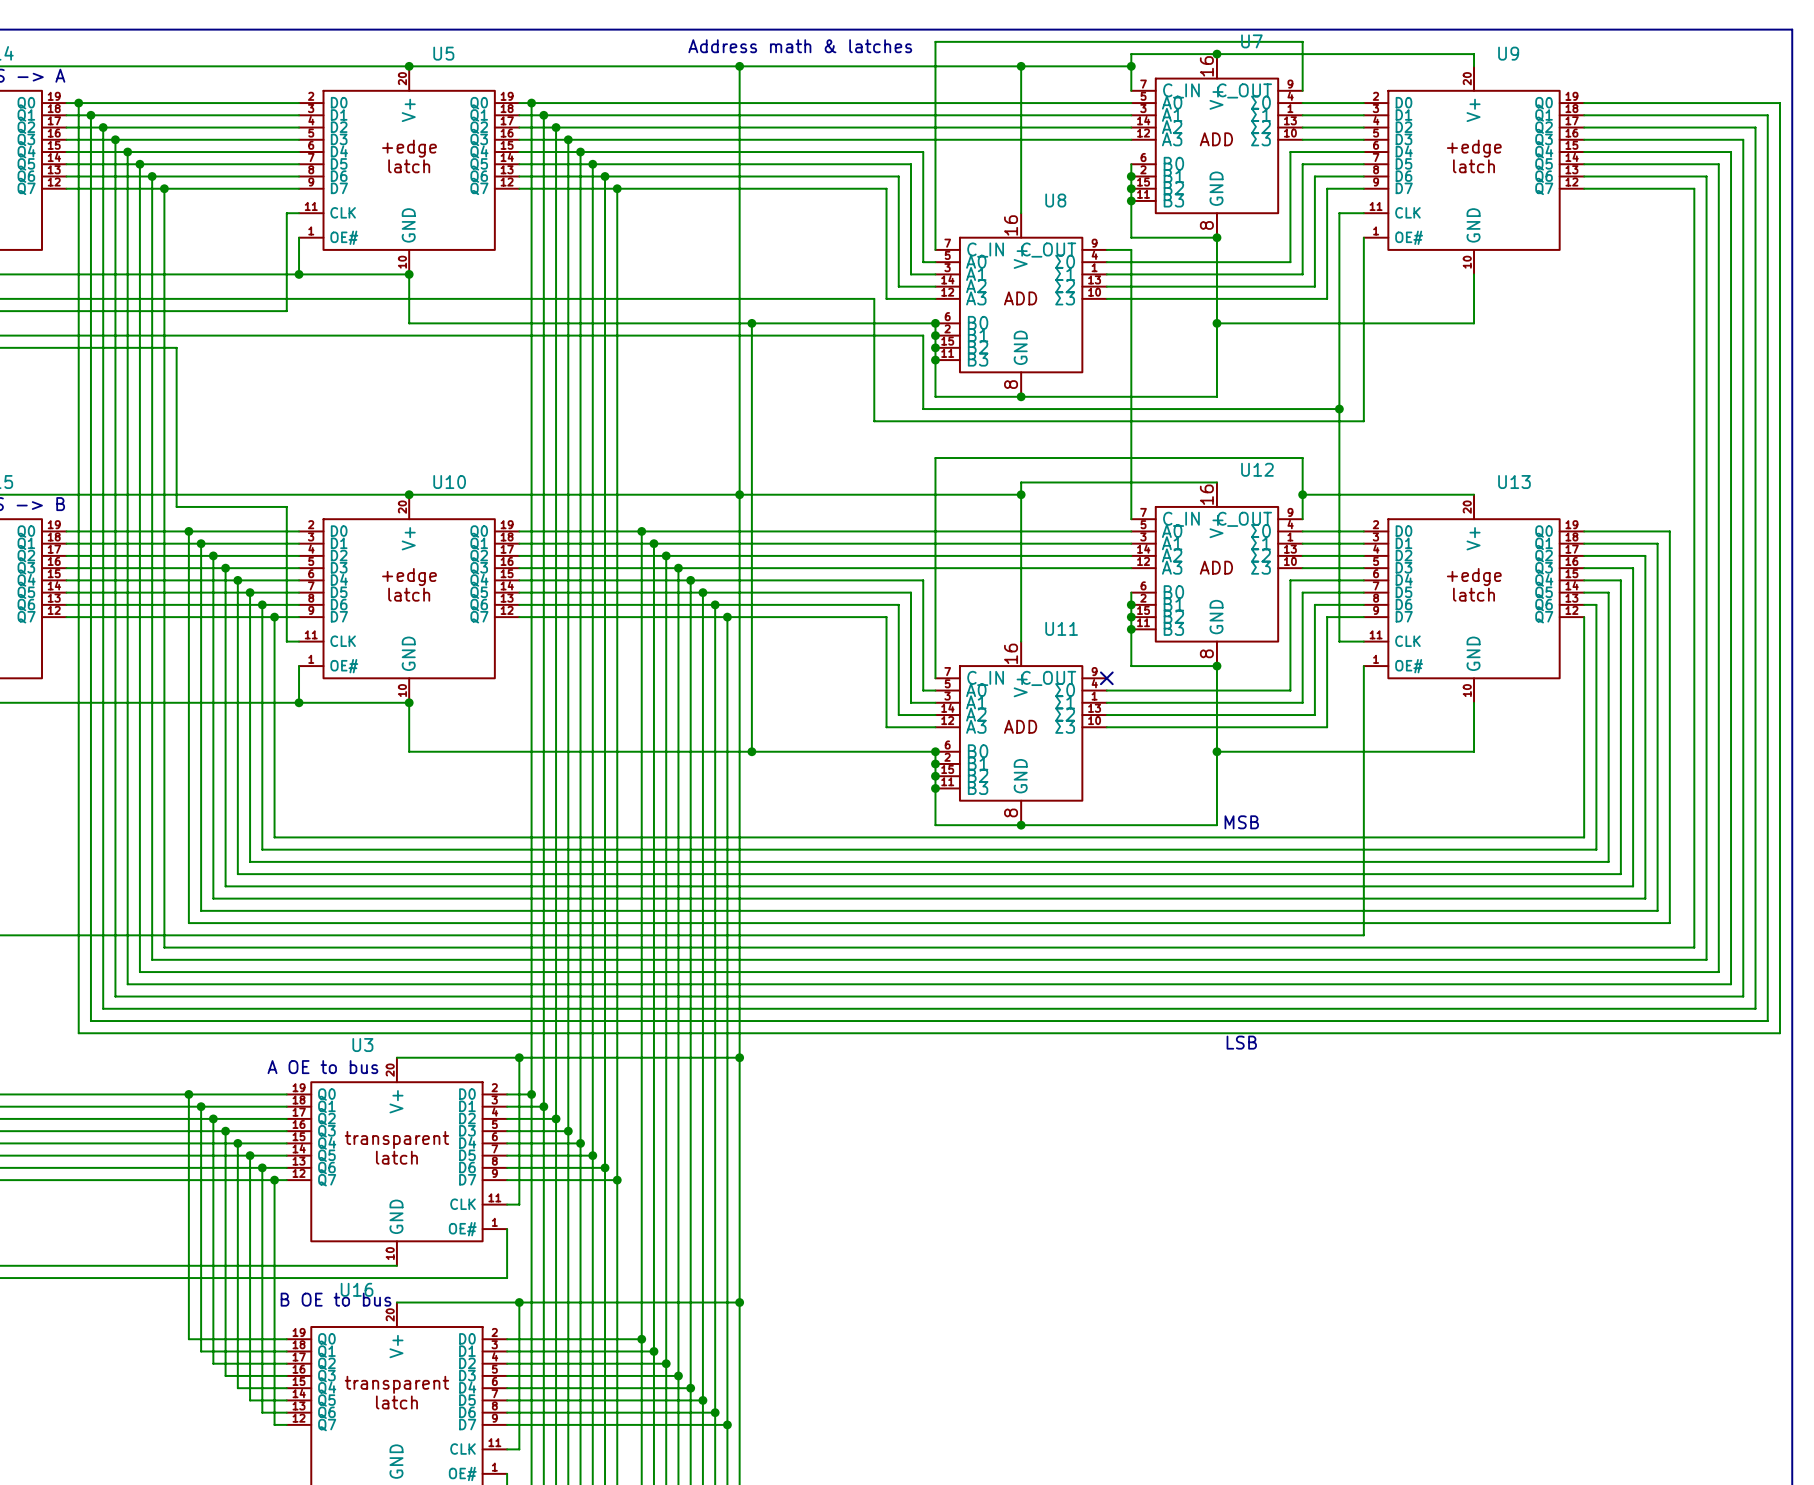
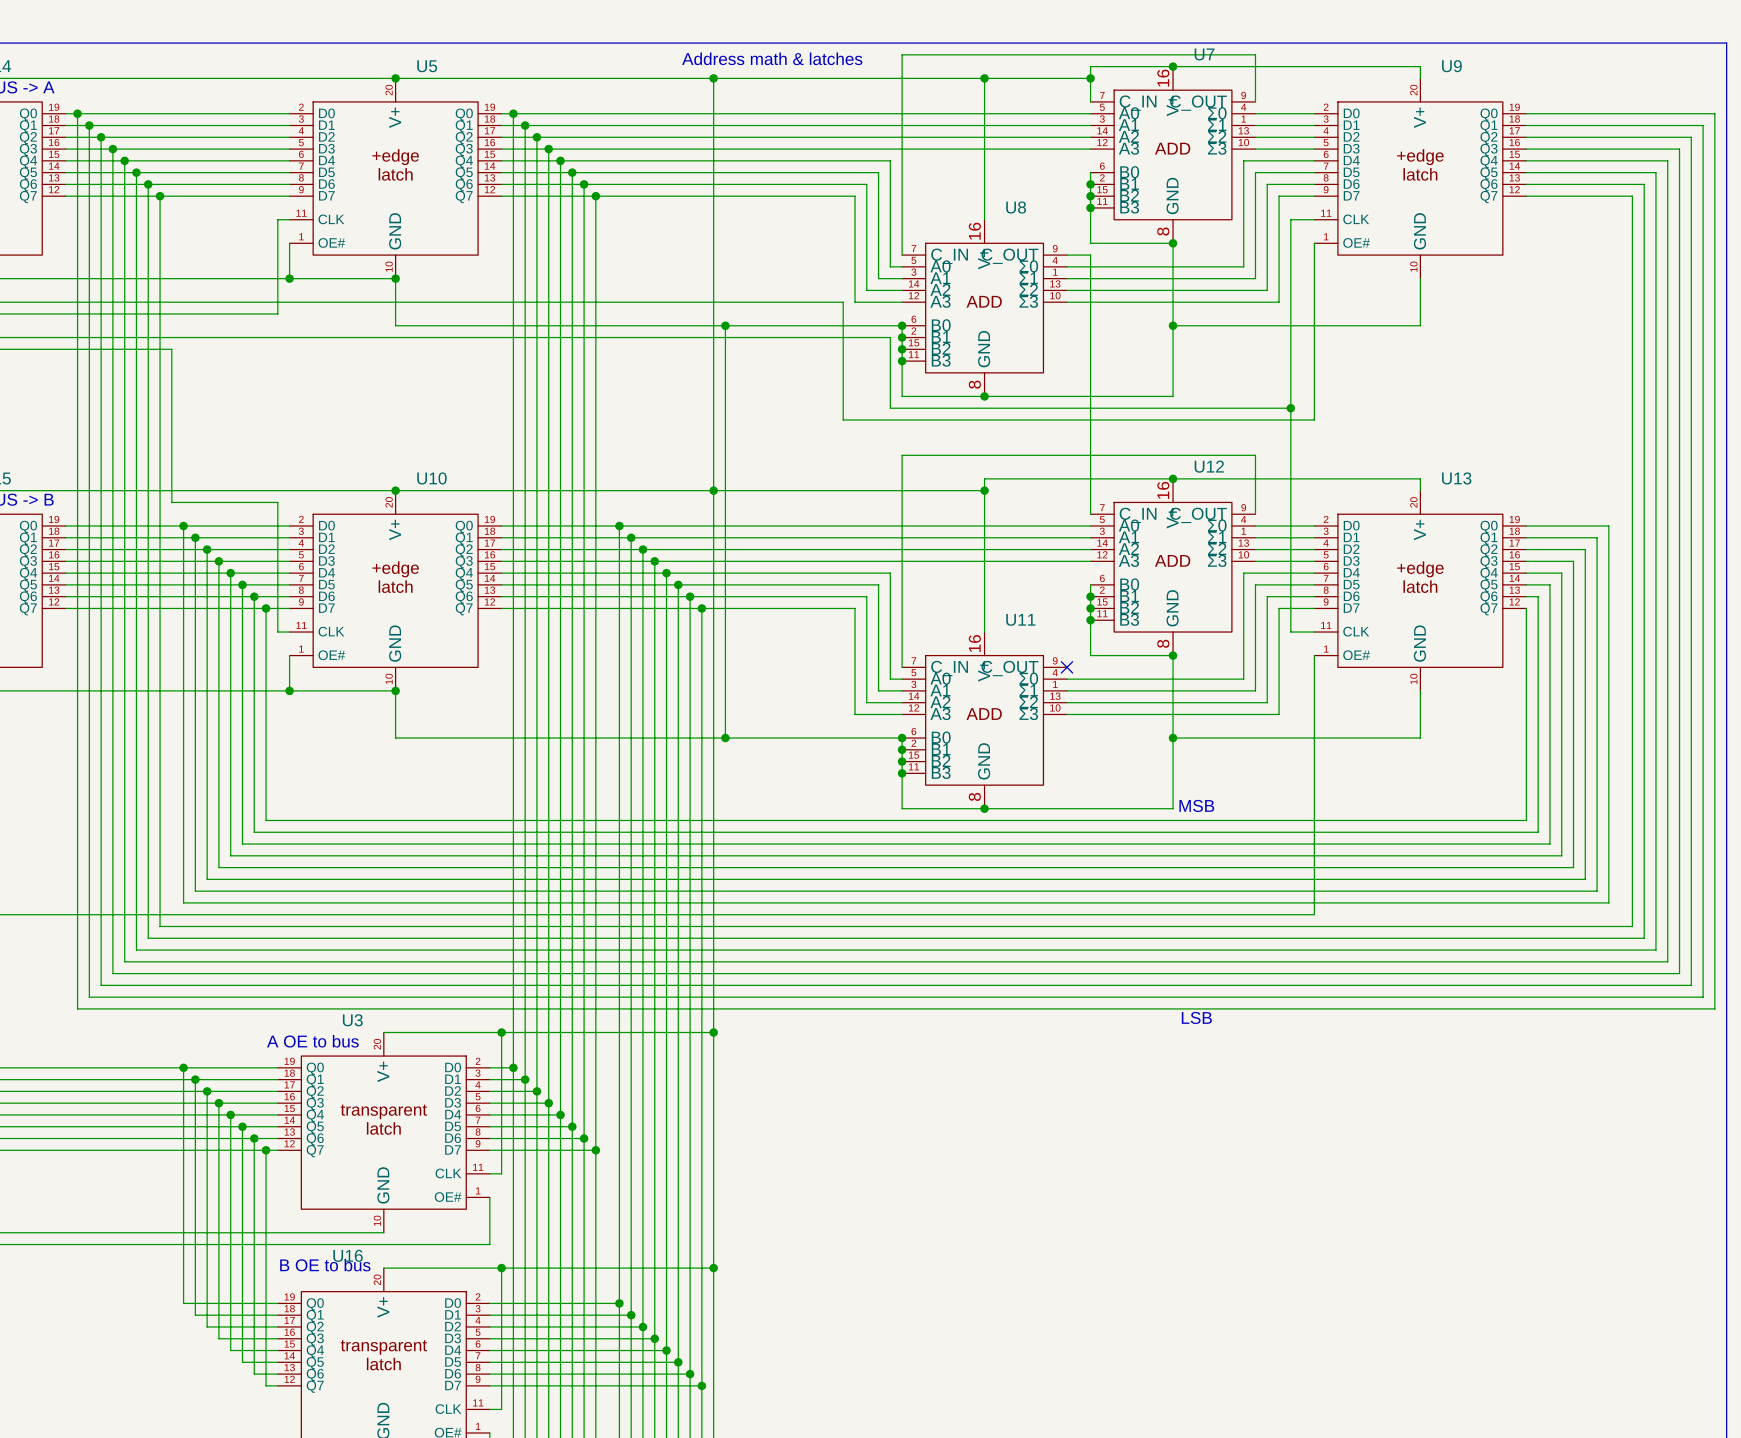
junction: none -> (1173, 478)
wire: (1302, 494) (1474, 494) -> (1173, 478) (1420, 478) (1420, 490)
junction: (1302, 494) -> none

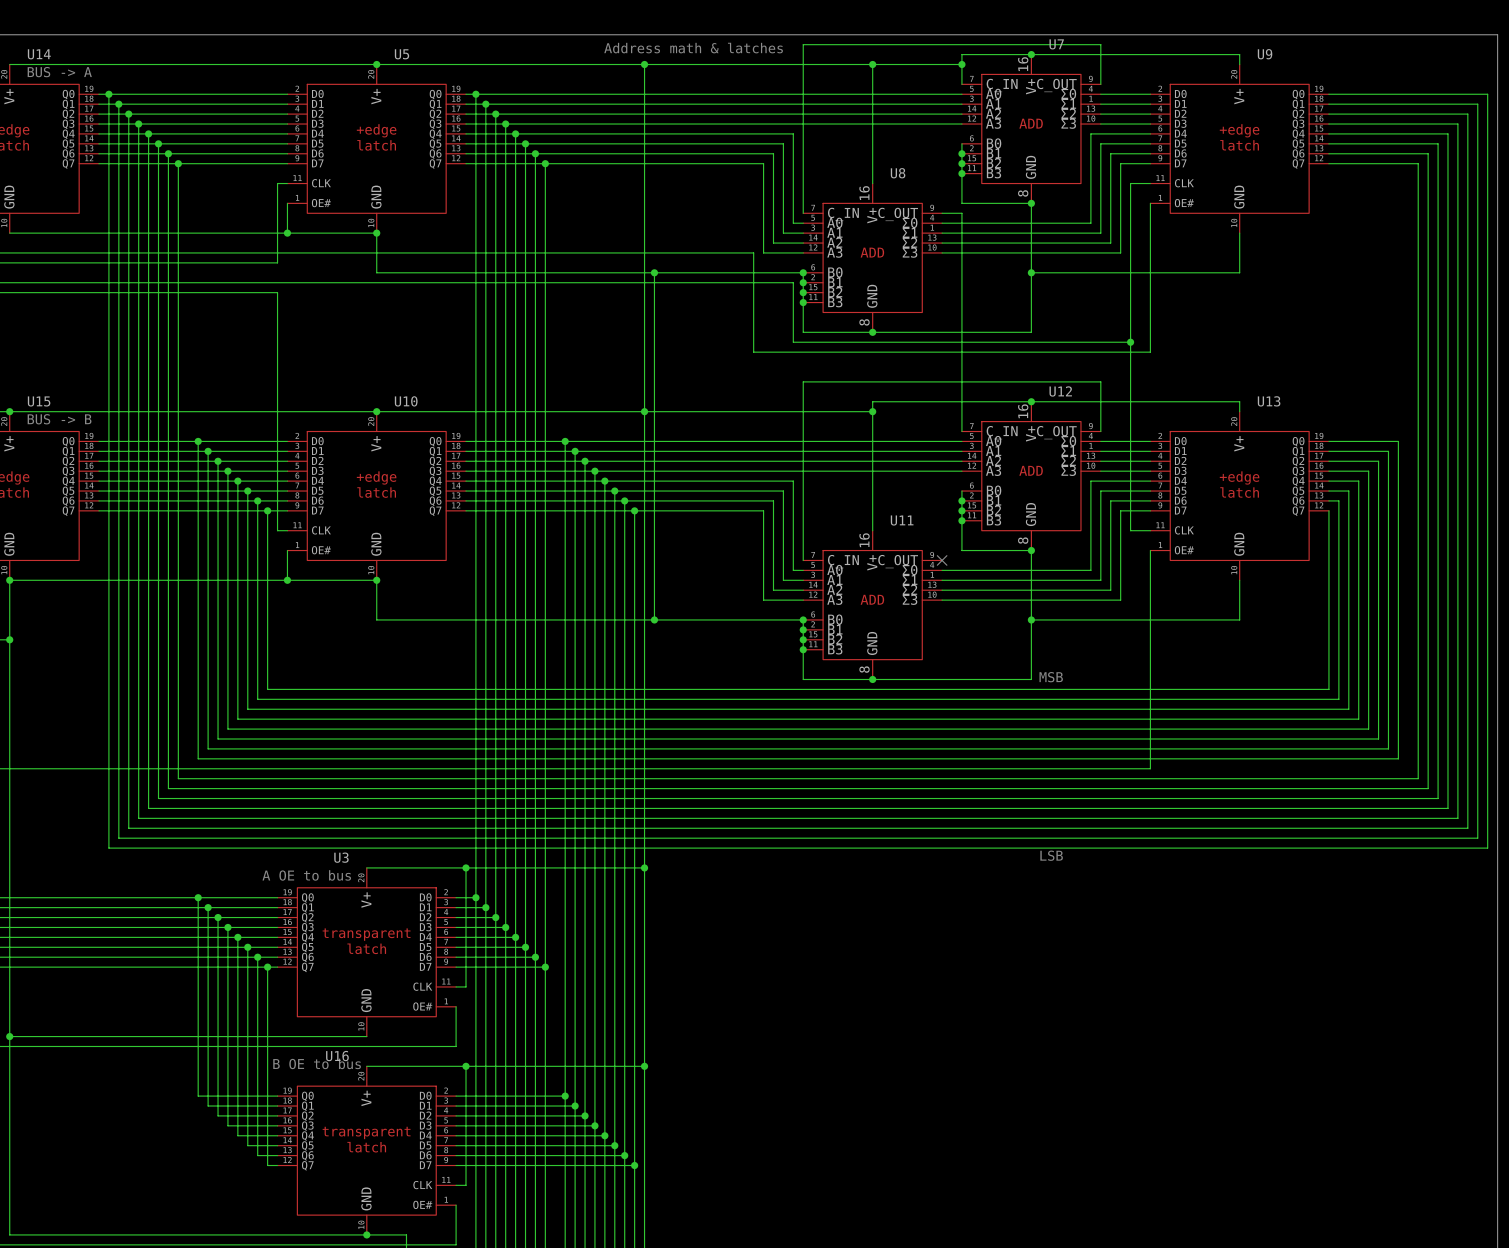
wire: (171, 349) (171, 502) (277, 502) -> (188, 292) (277, 292) (277, 421)

